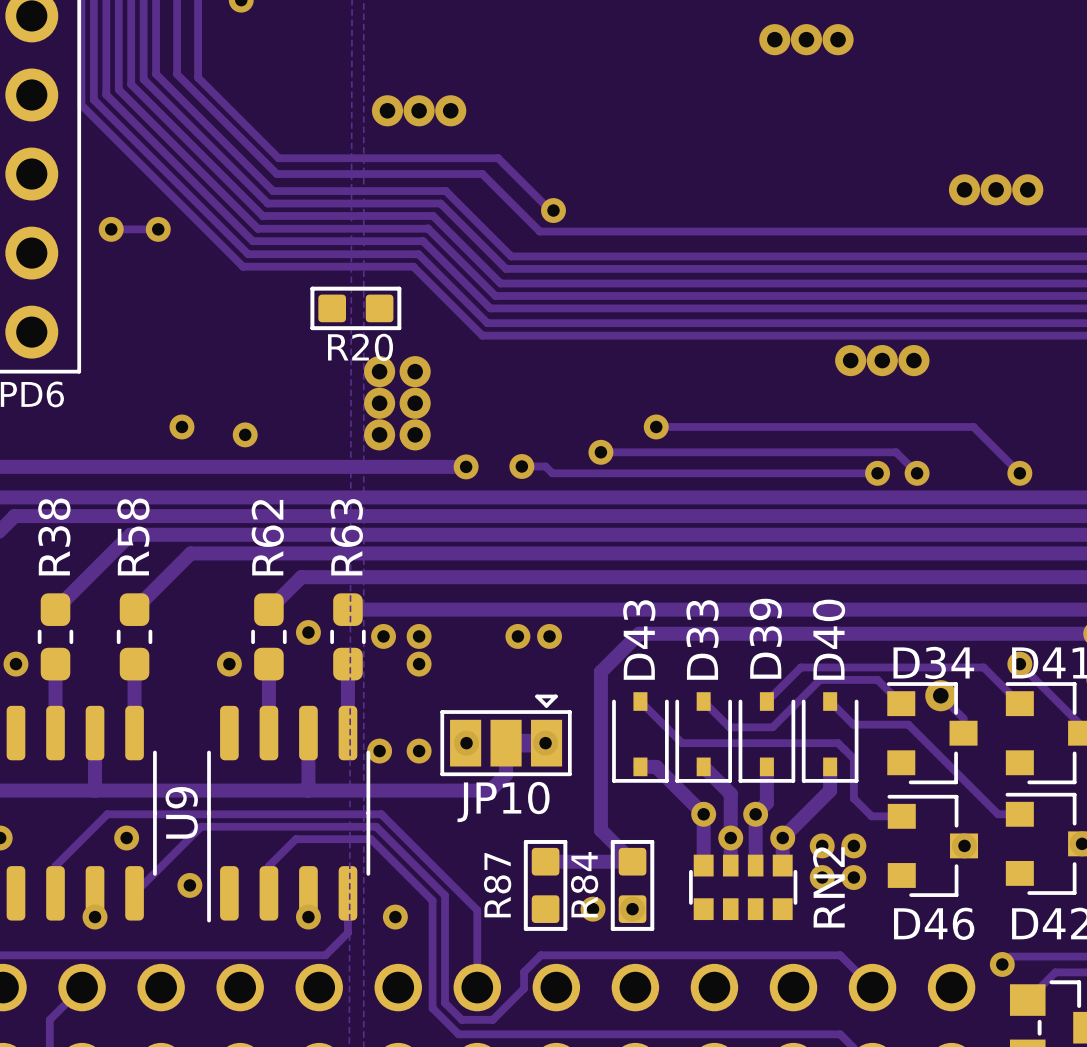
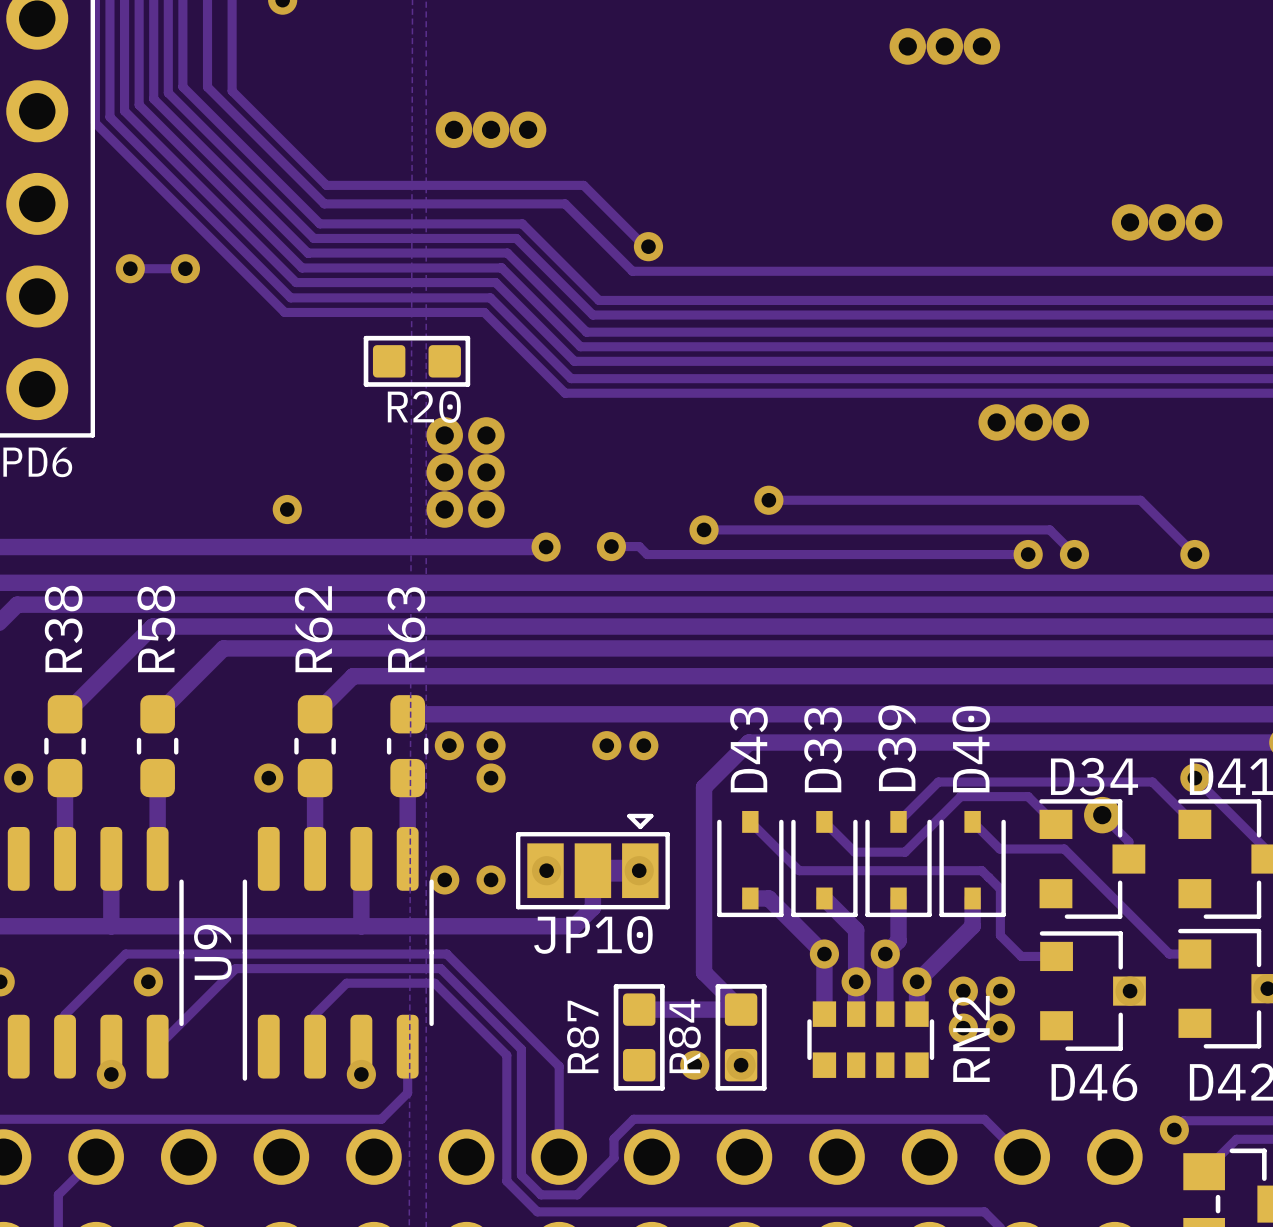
via: (181, 426) -> none
via: (308, 632) -> none
via: (189, 885) -> none
via: (395, 917) -> none

